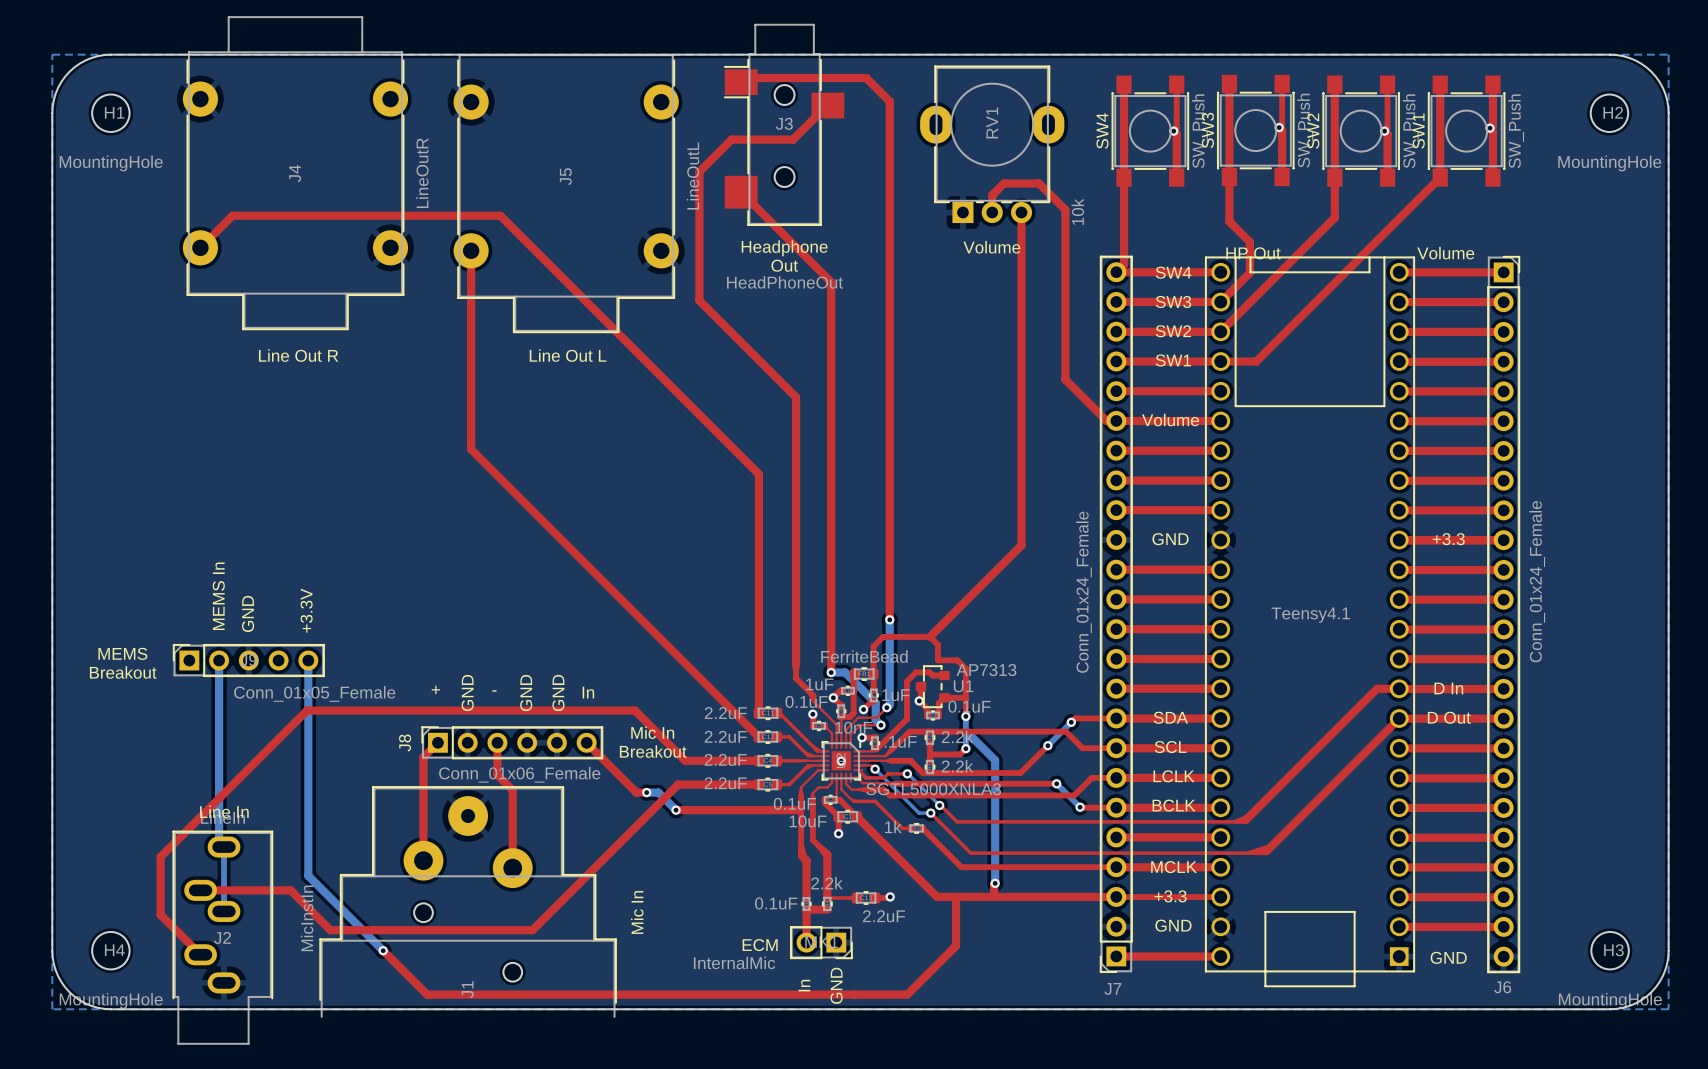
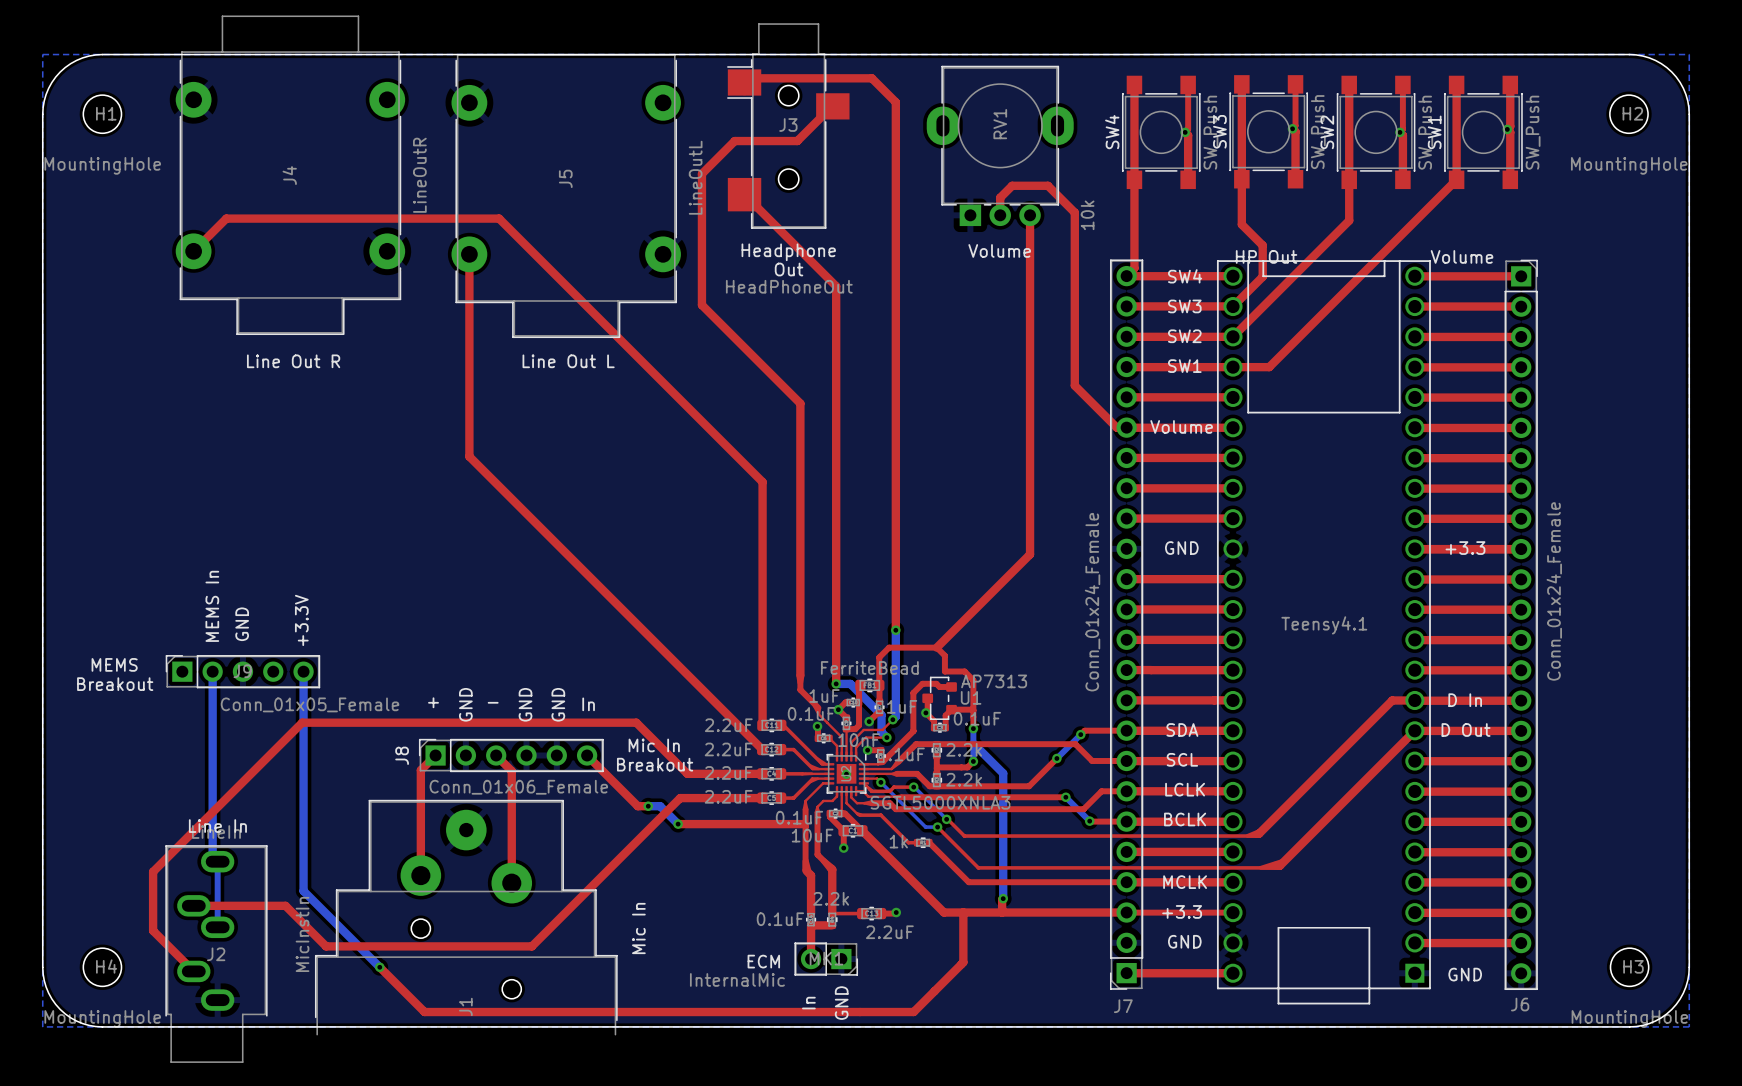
top track: (497, 742) (497, 775) (512, 790) -> (496, 755) (511, 771) (511, 803)

